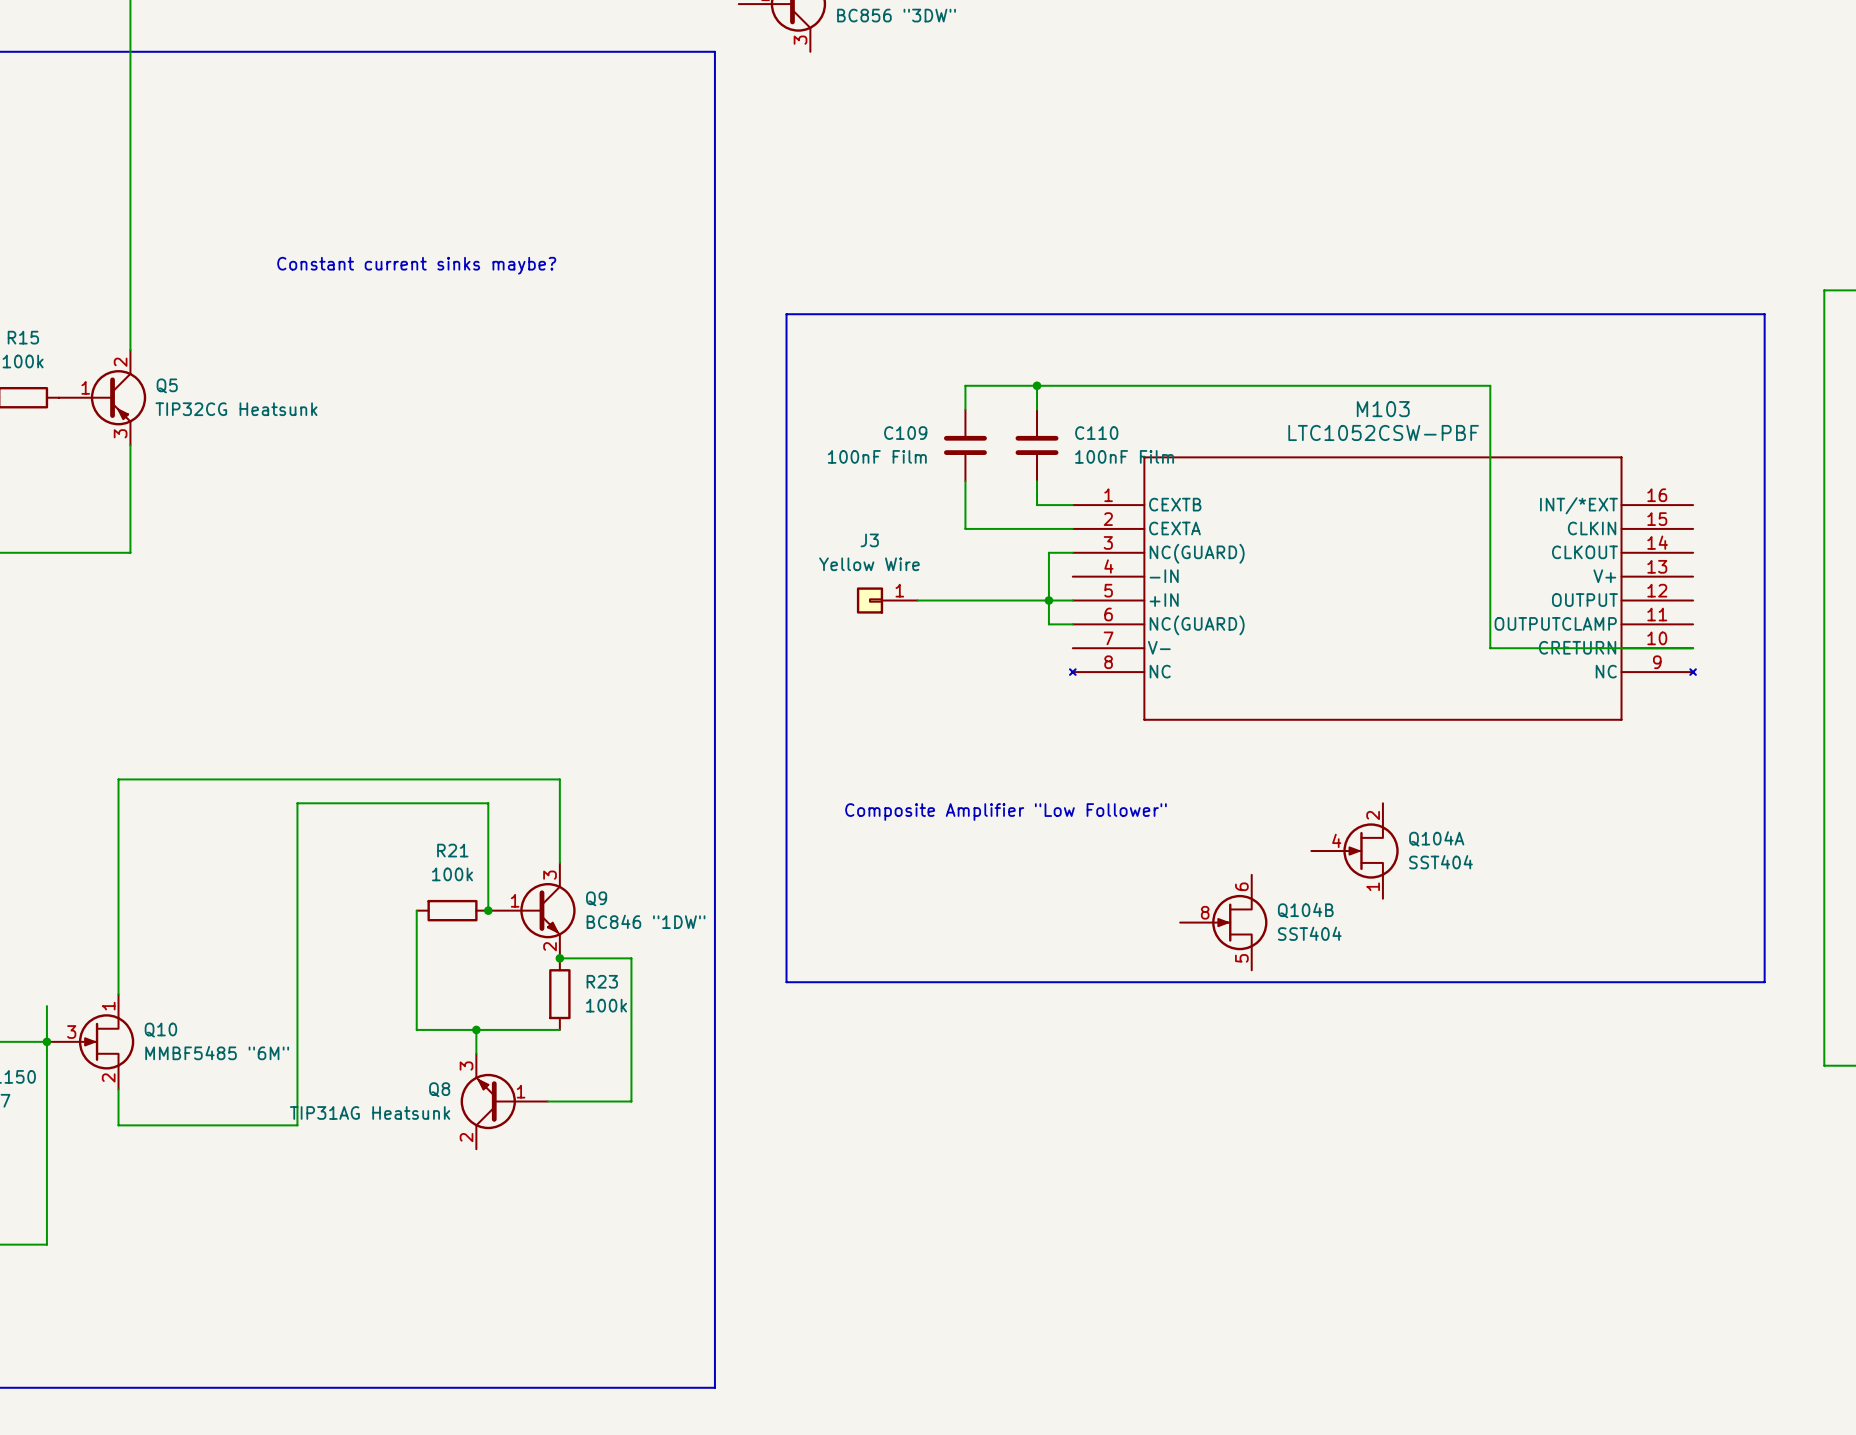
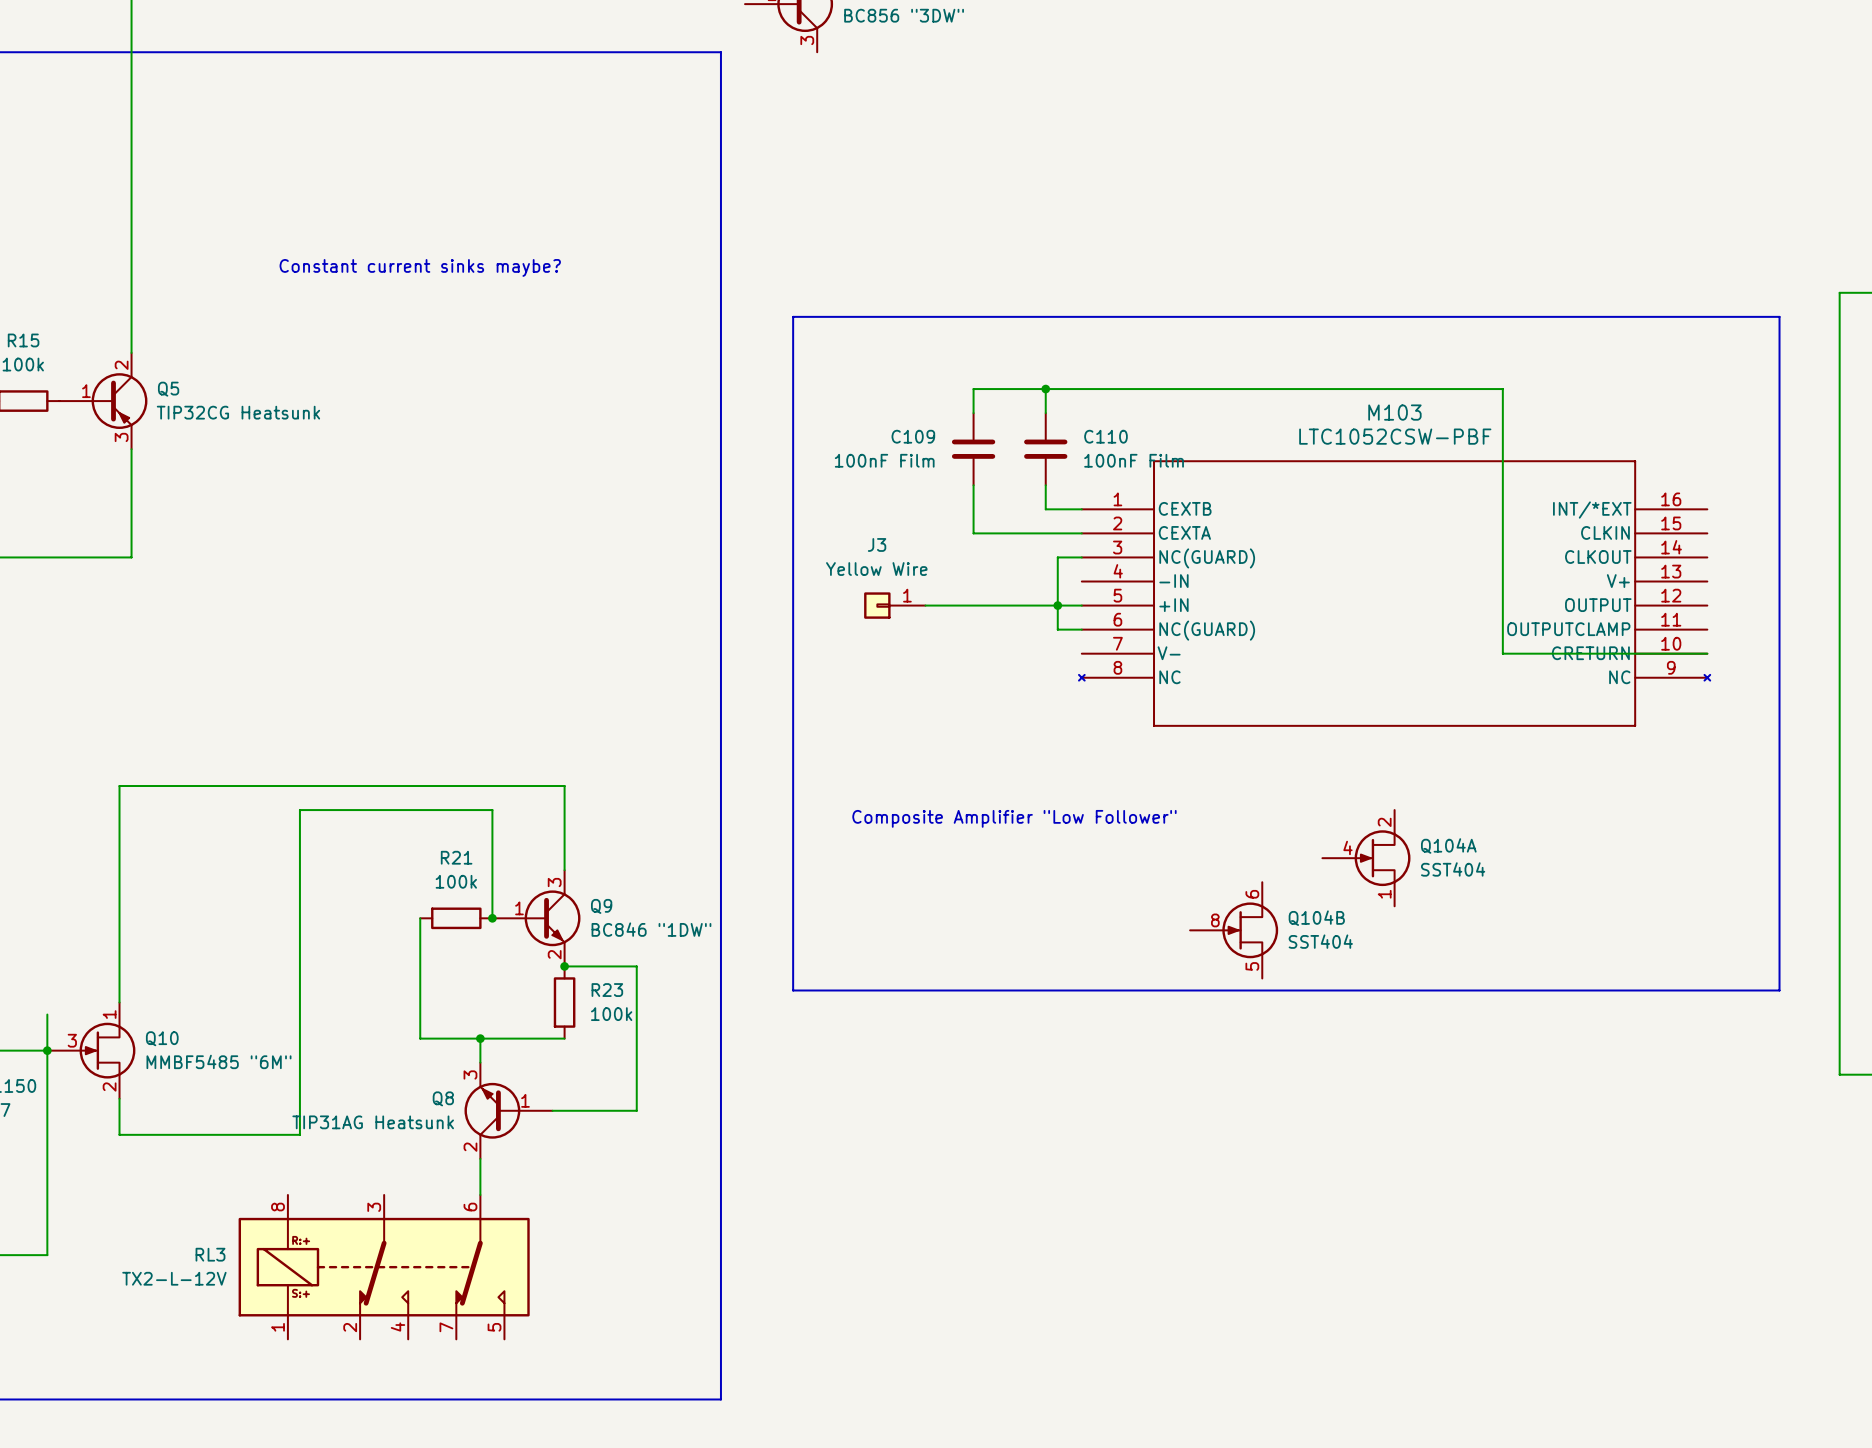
wire: none -> (480, 1158) (480, 1194)
RL3: none -> TX2-L-12V (384, 1267)

